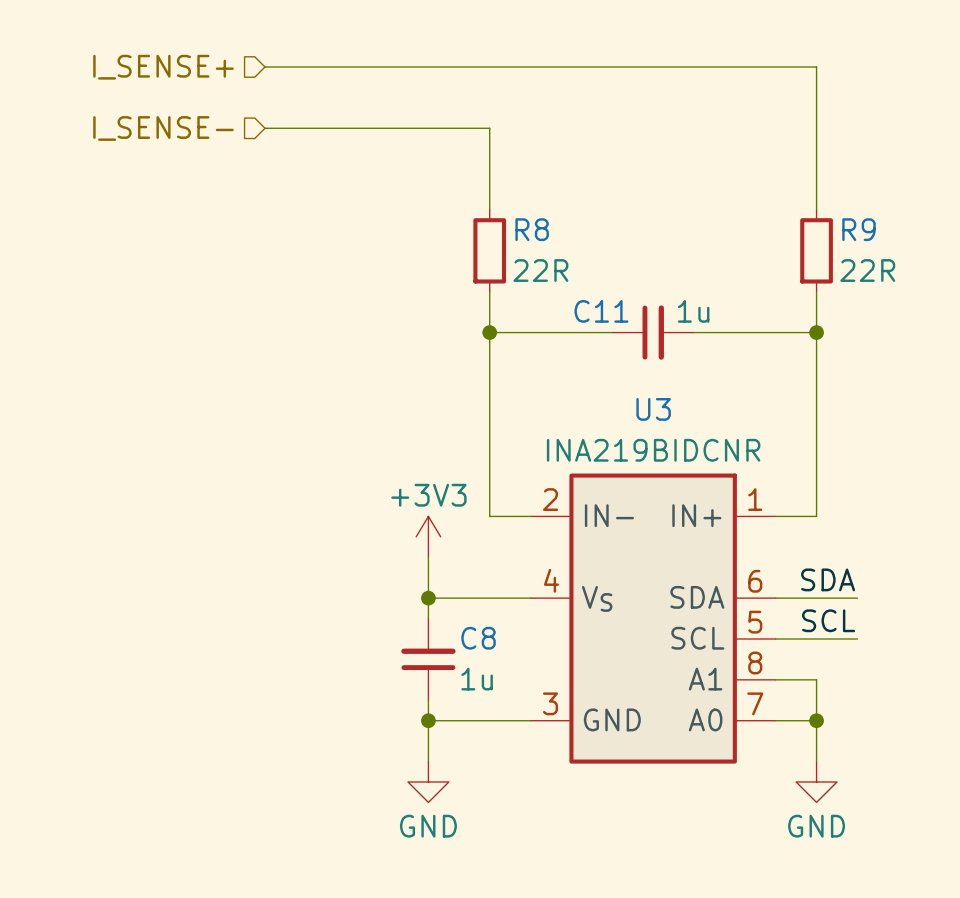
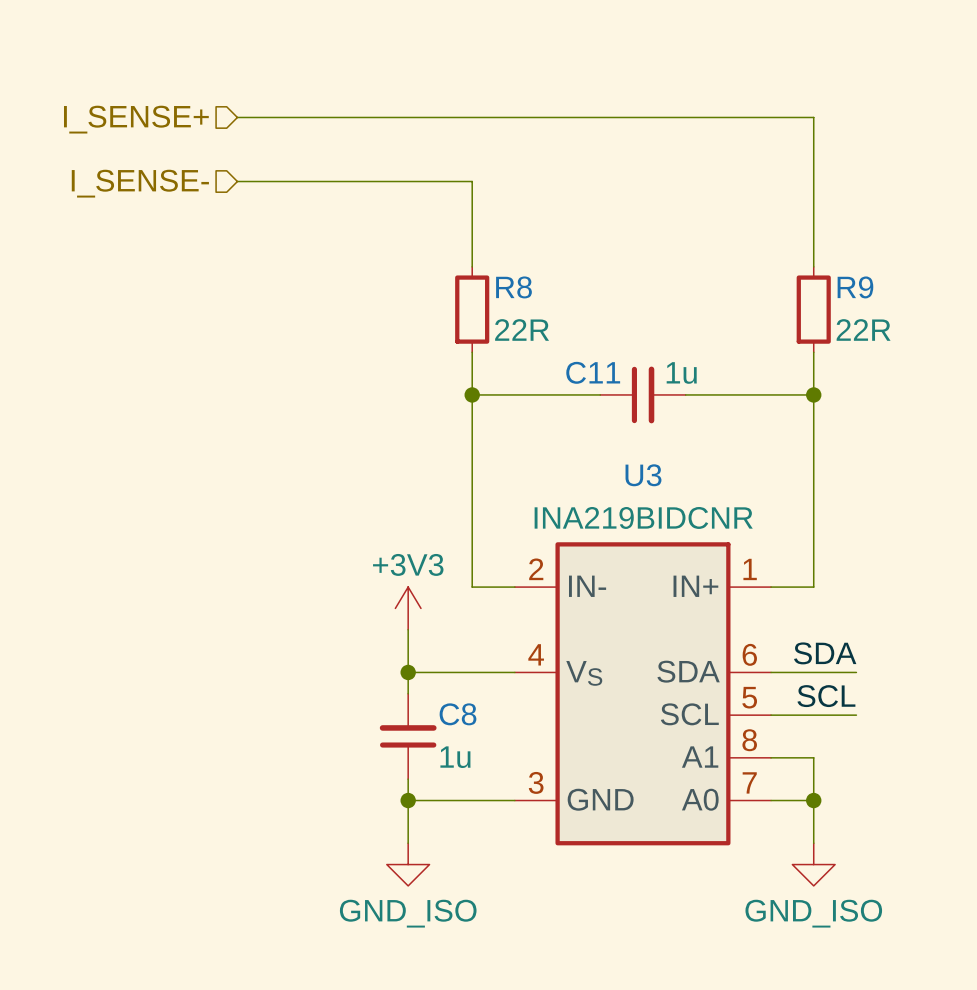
power symbol: GND (428, 781) -> GND_ISO (408, 864)
power symbol: GND (816, 781) -> GND_ISO (813, 864)

